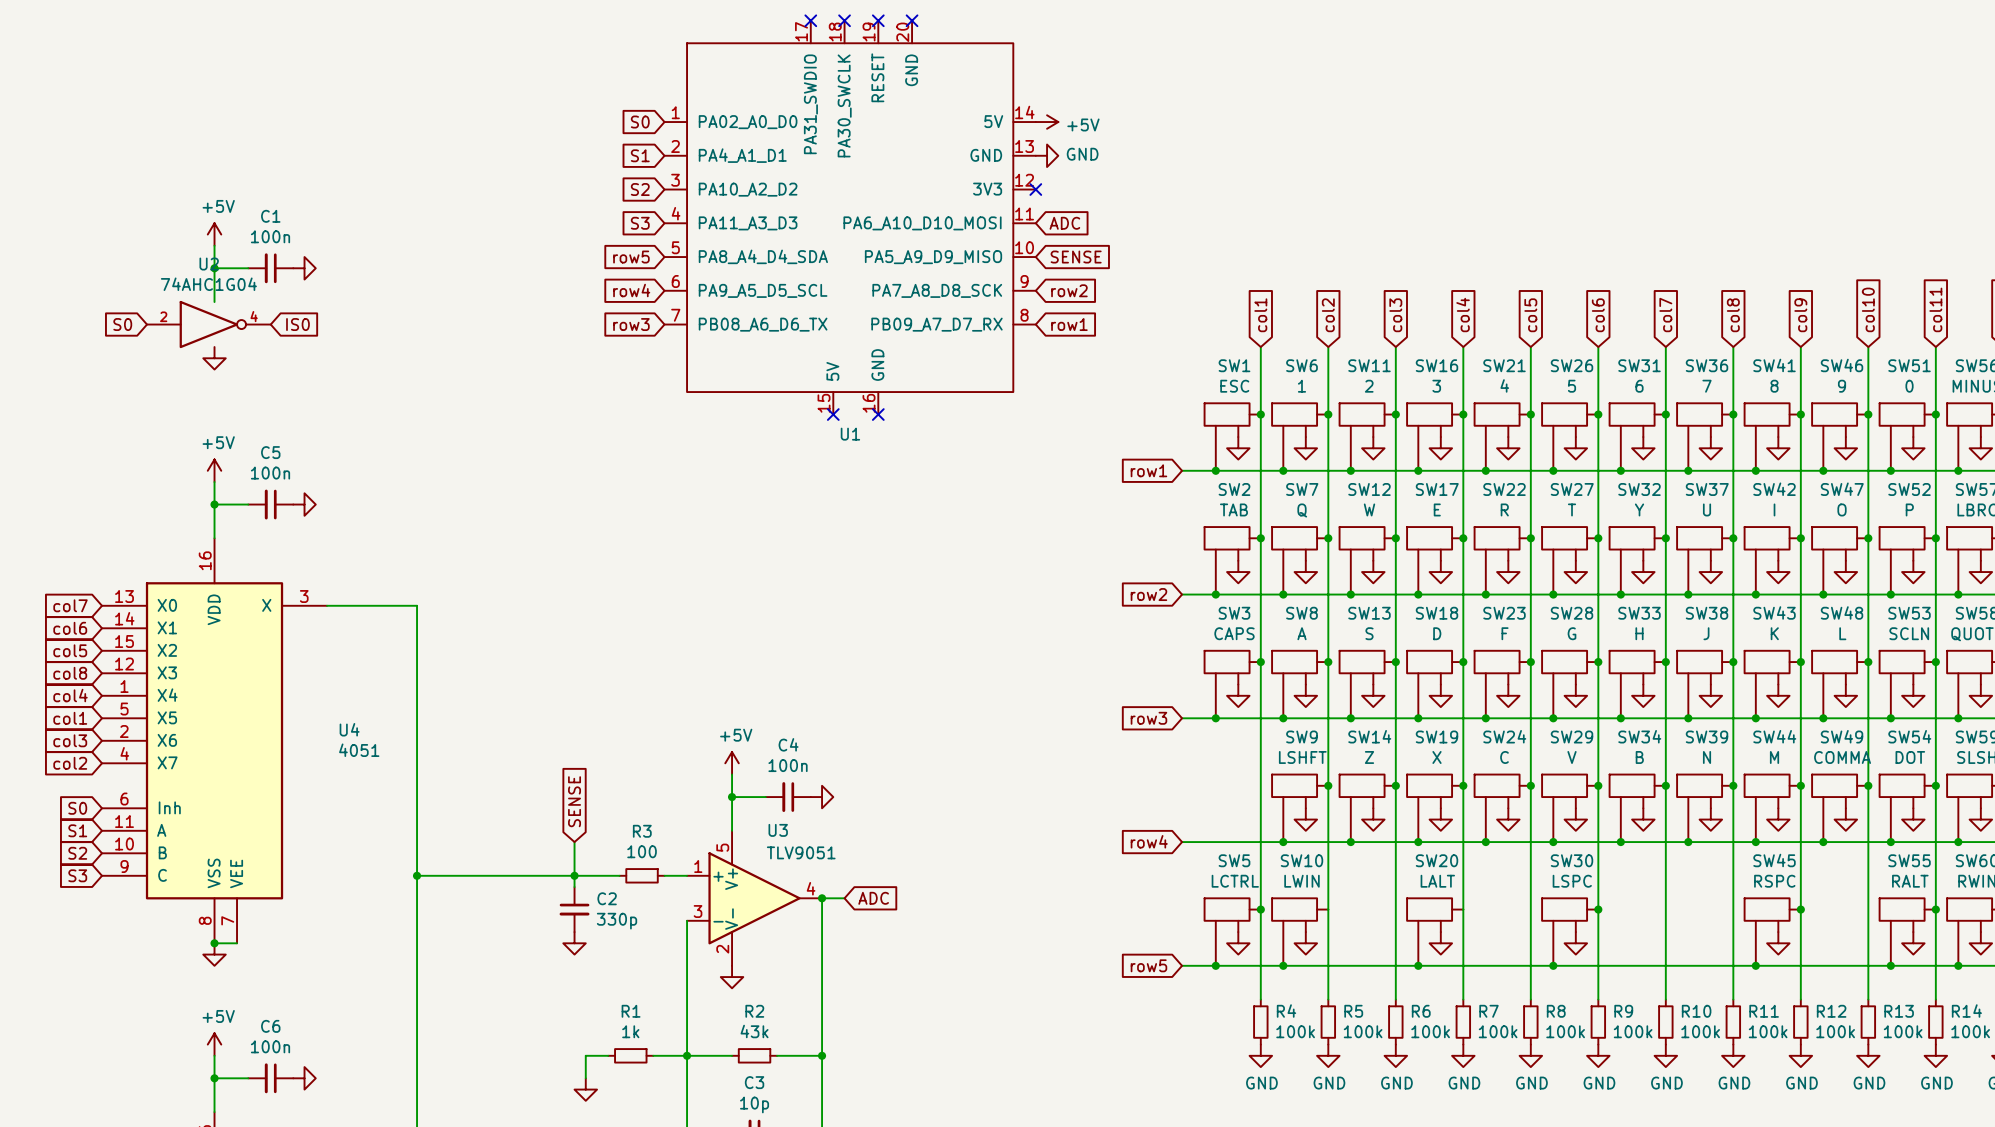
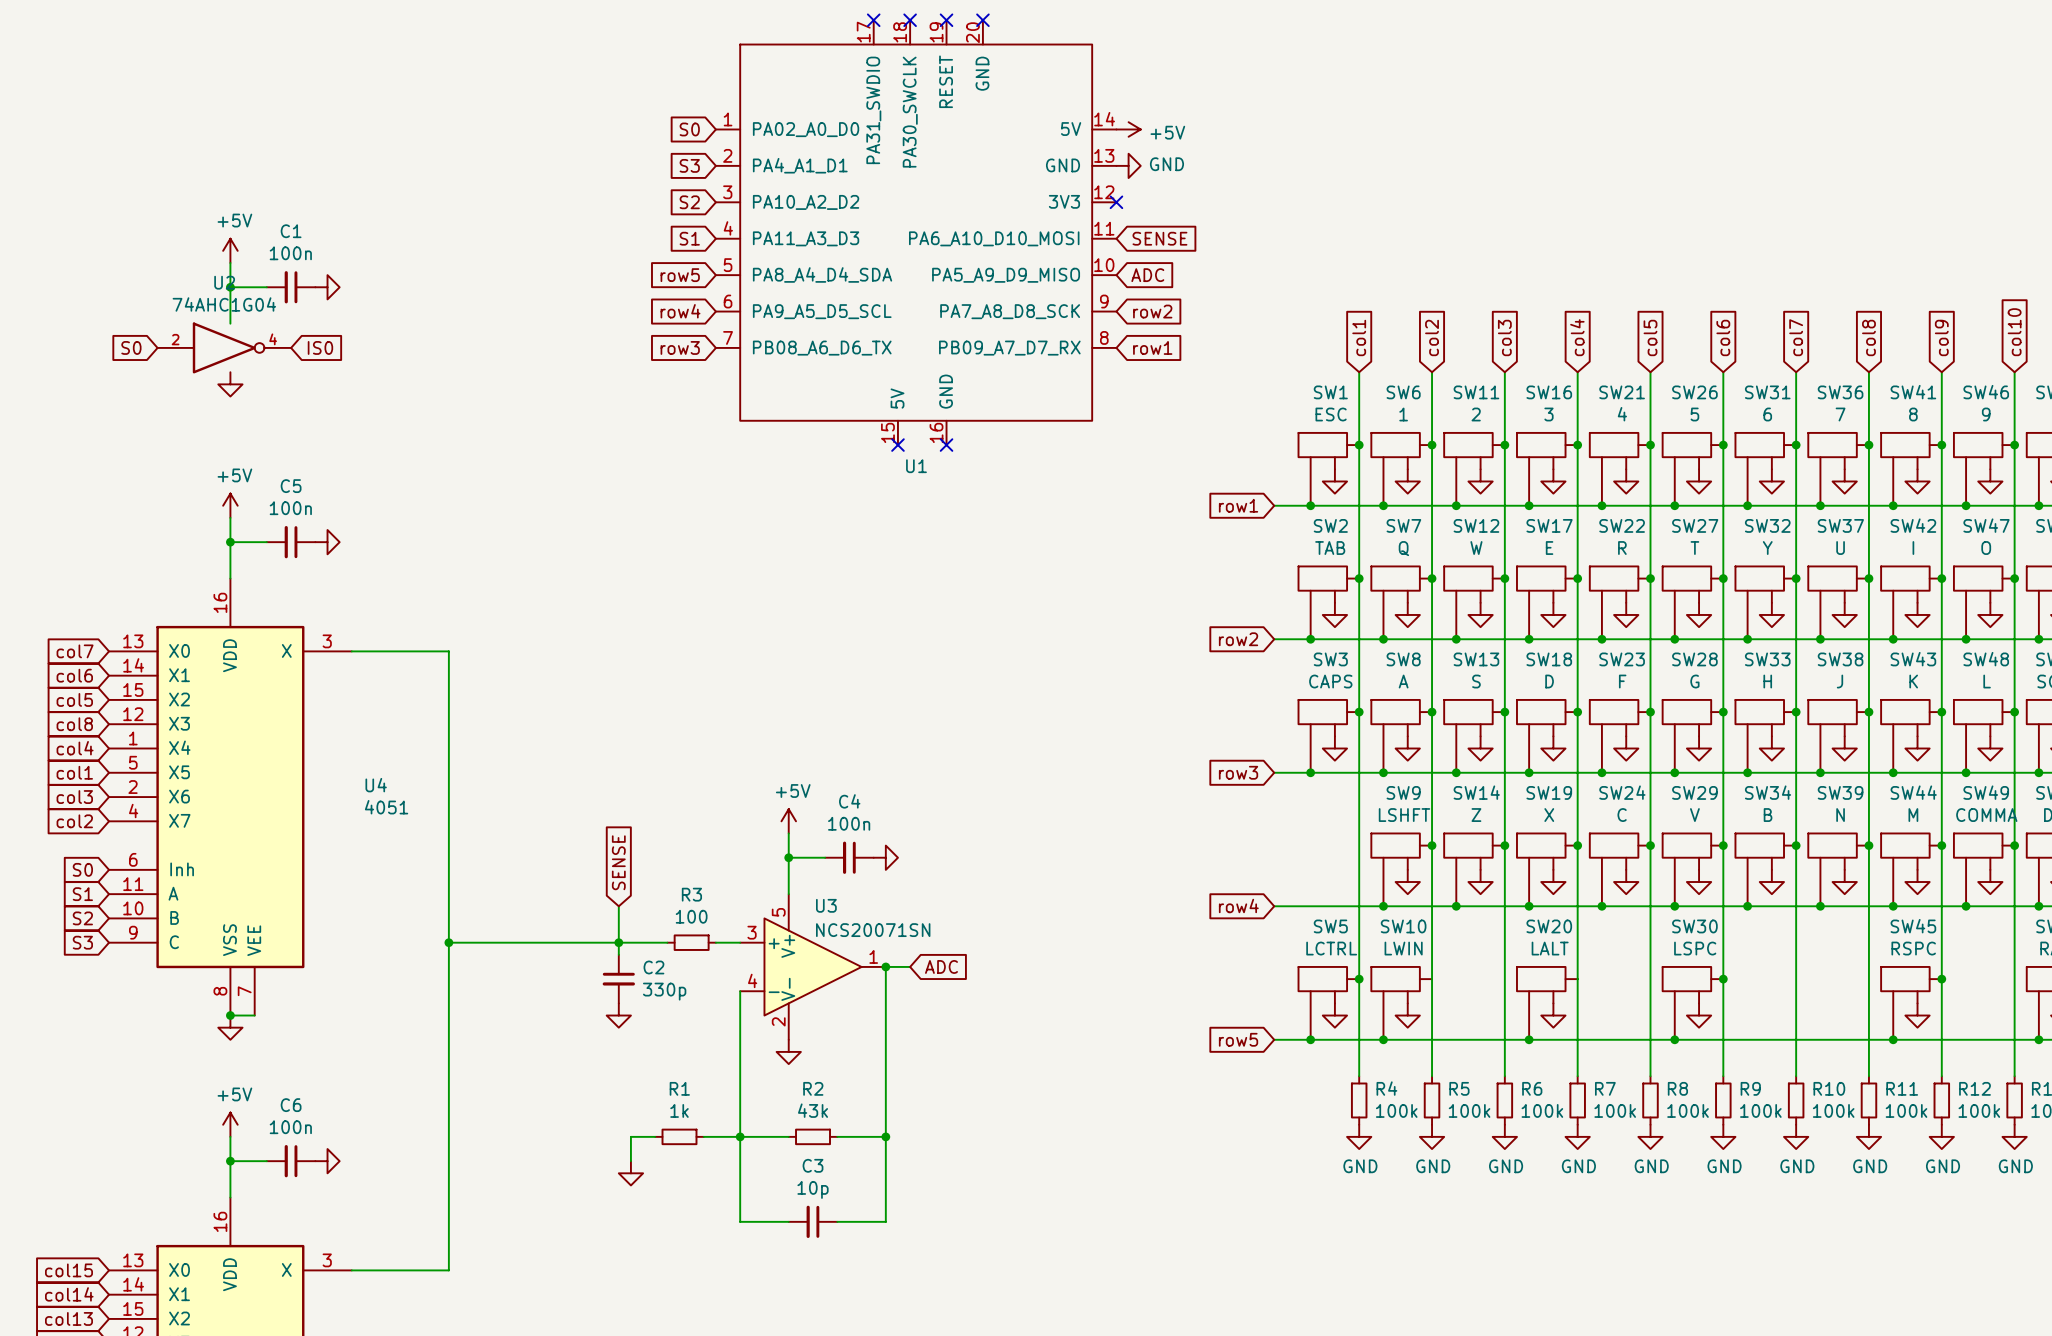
global label: S1 (640, 155) -> S3 (689, 165)
global label: S3 (640, 223) -> S1 (689, 238)
global label: ADC (1064, 223) -> SENSE (1159, 238)
global label: SENSE (1076, 257) -> ADC (1147, 275)
U3 symbol: [687, 830, 823, 966] -> [740, 894, 886, 1040]
U3 value: TLV9051 (801, 852) -> NCS20071SN (873, 930)

